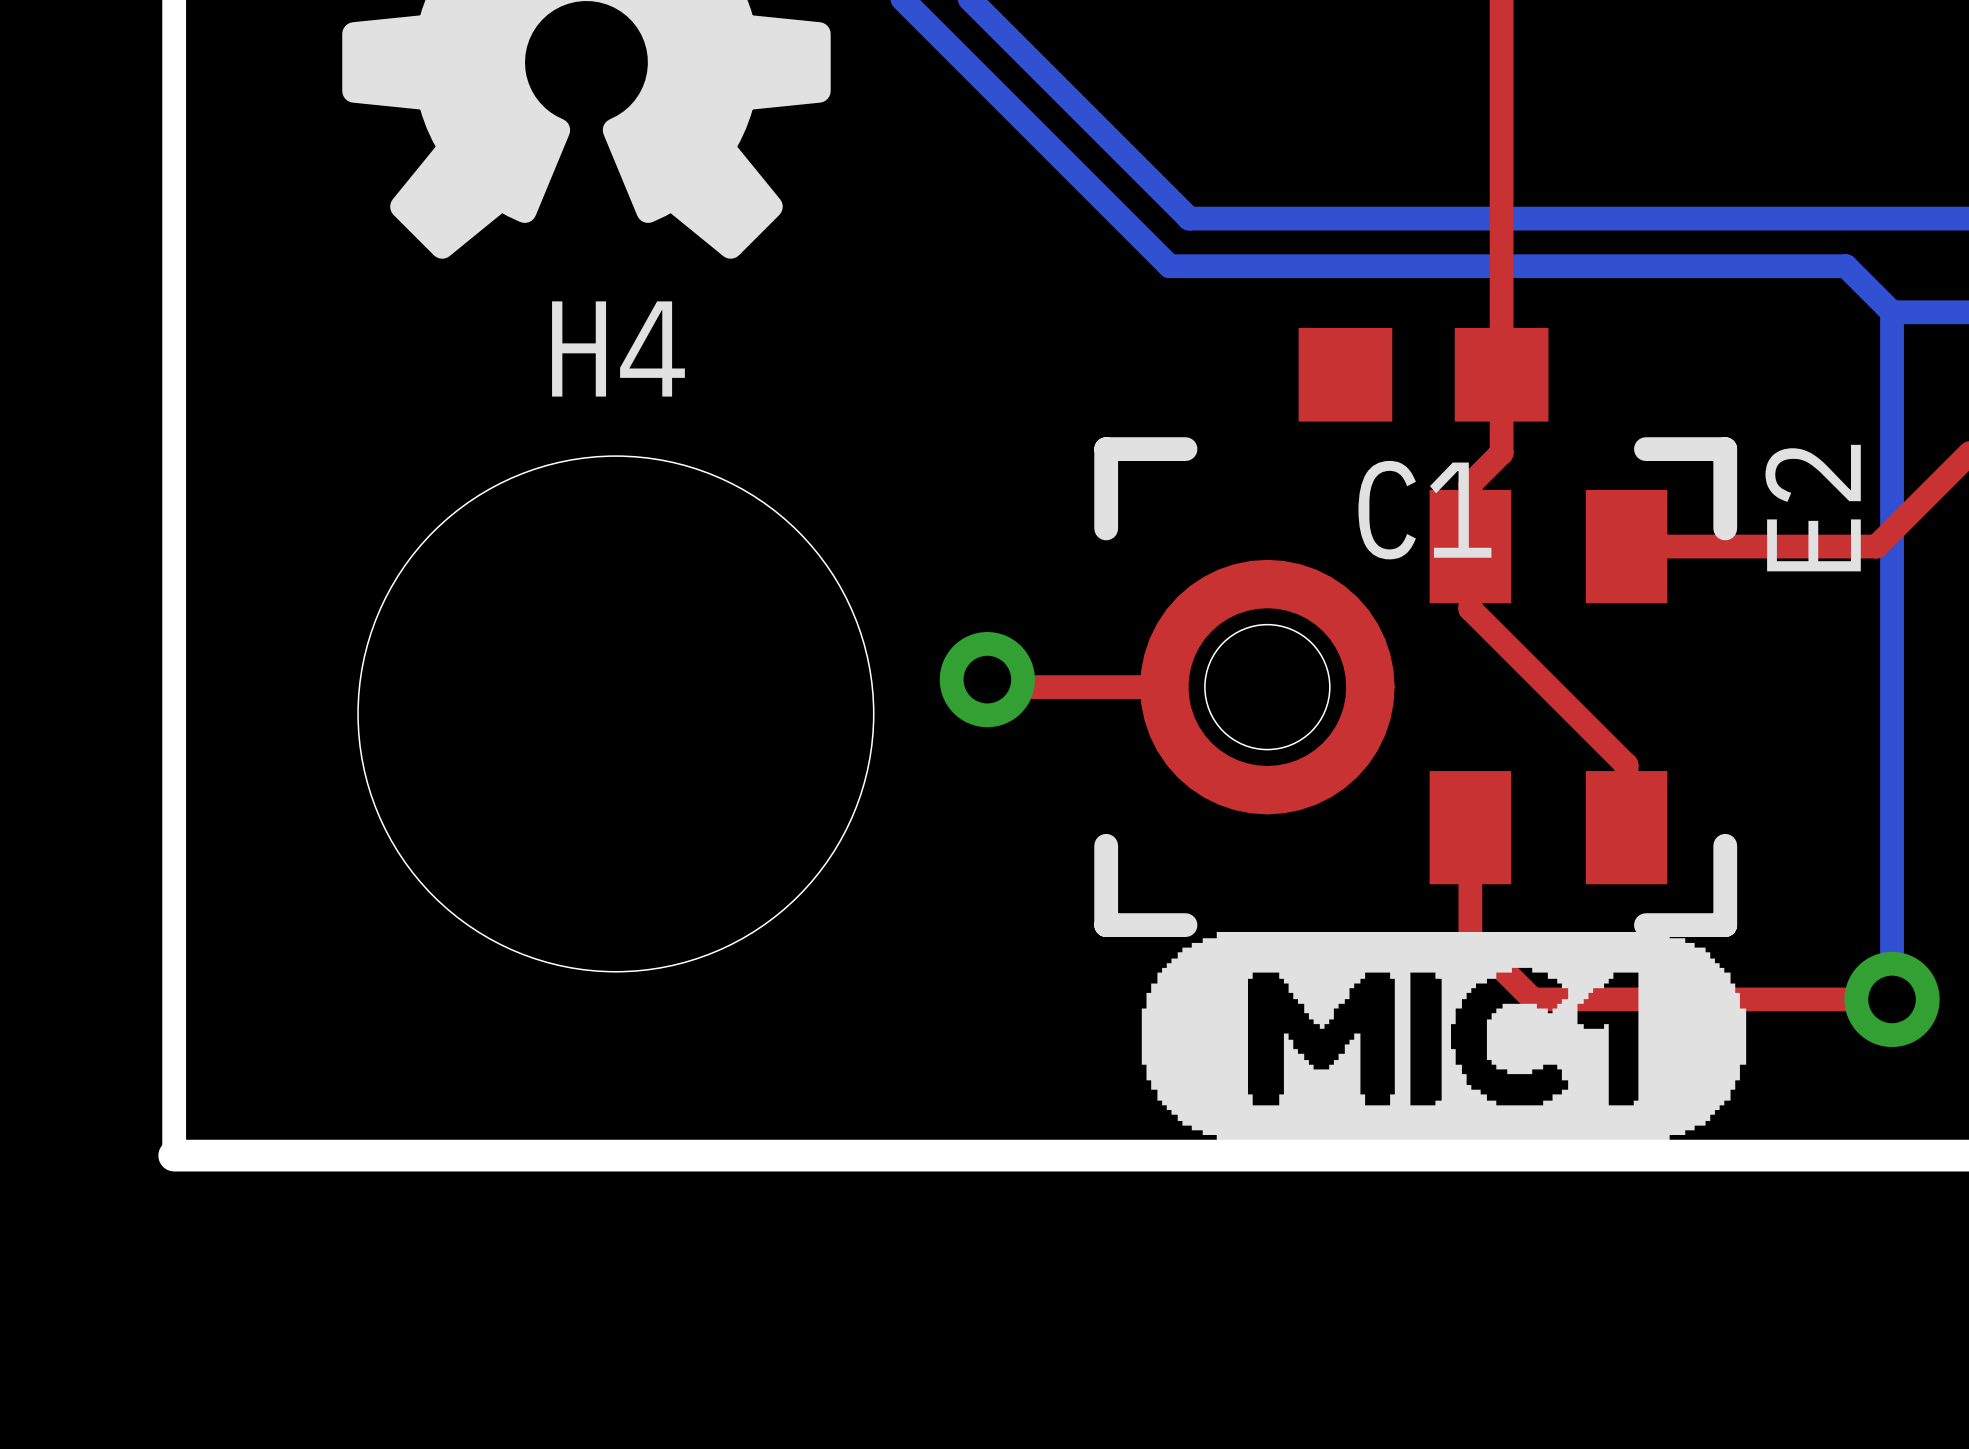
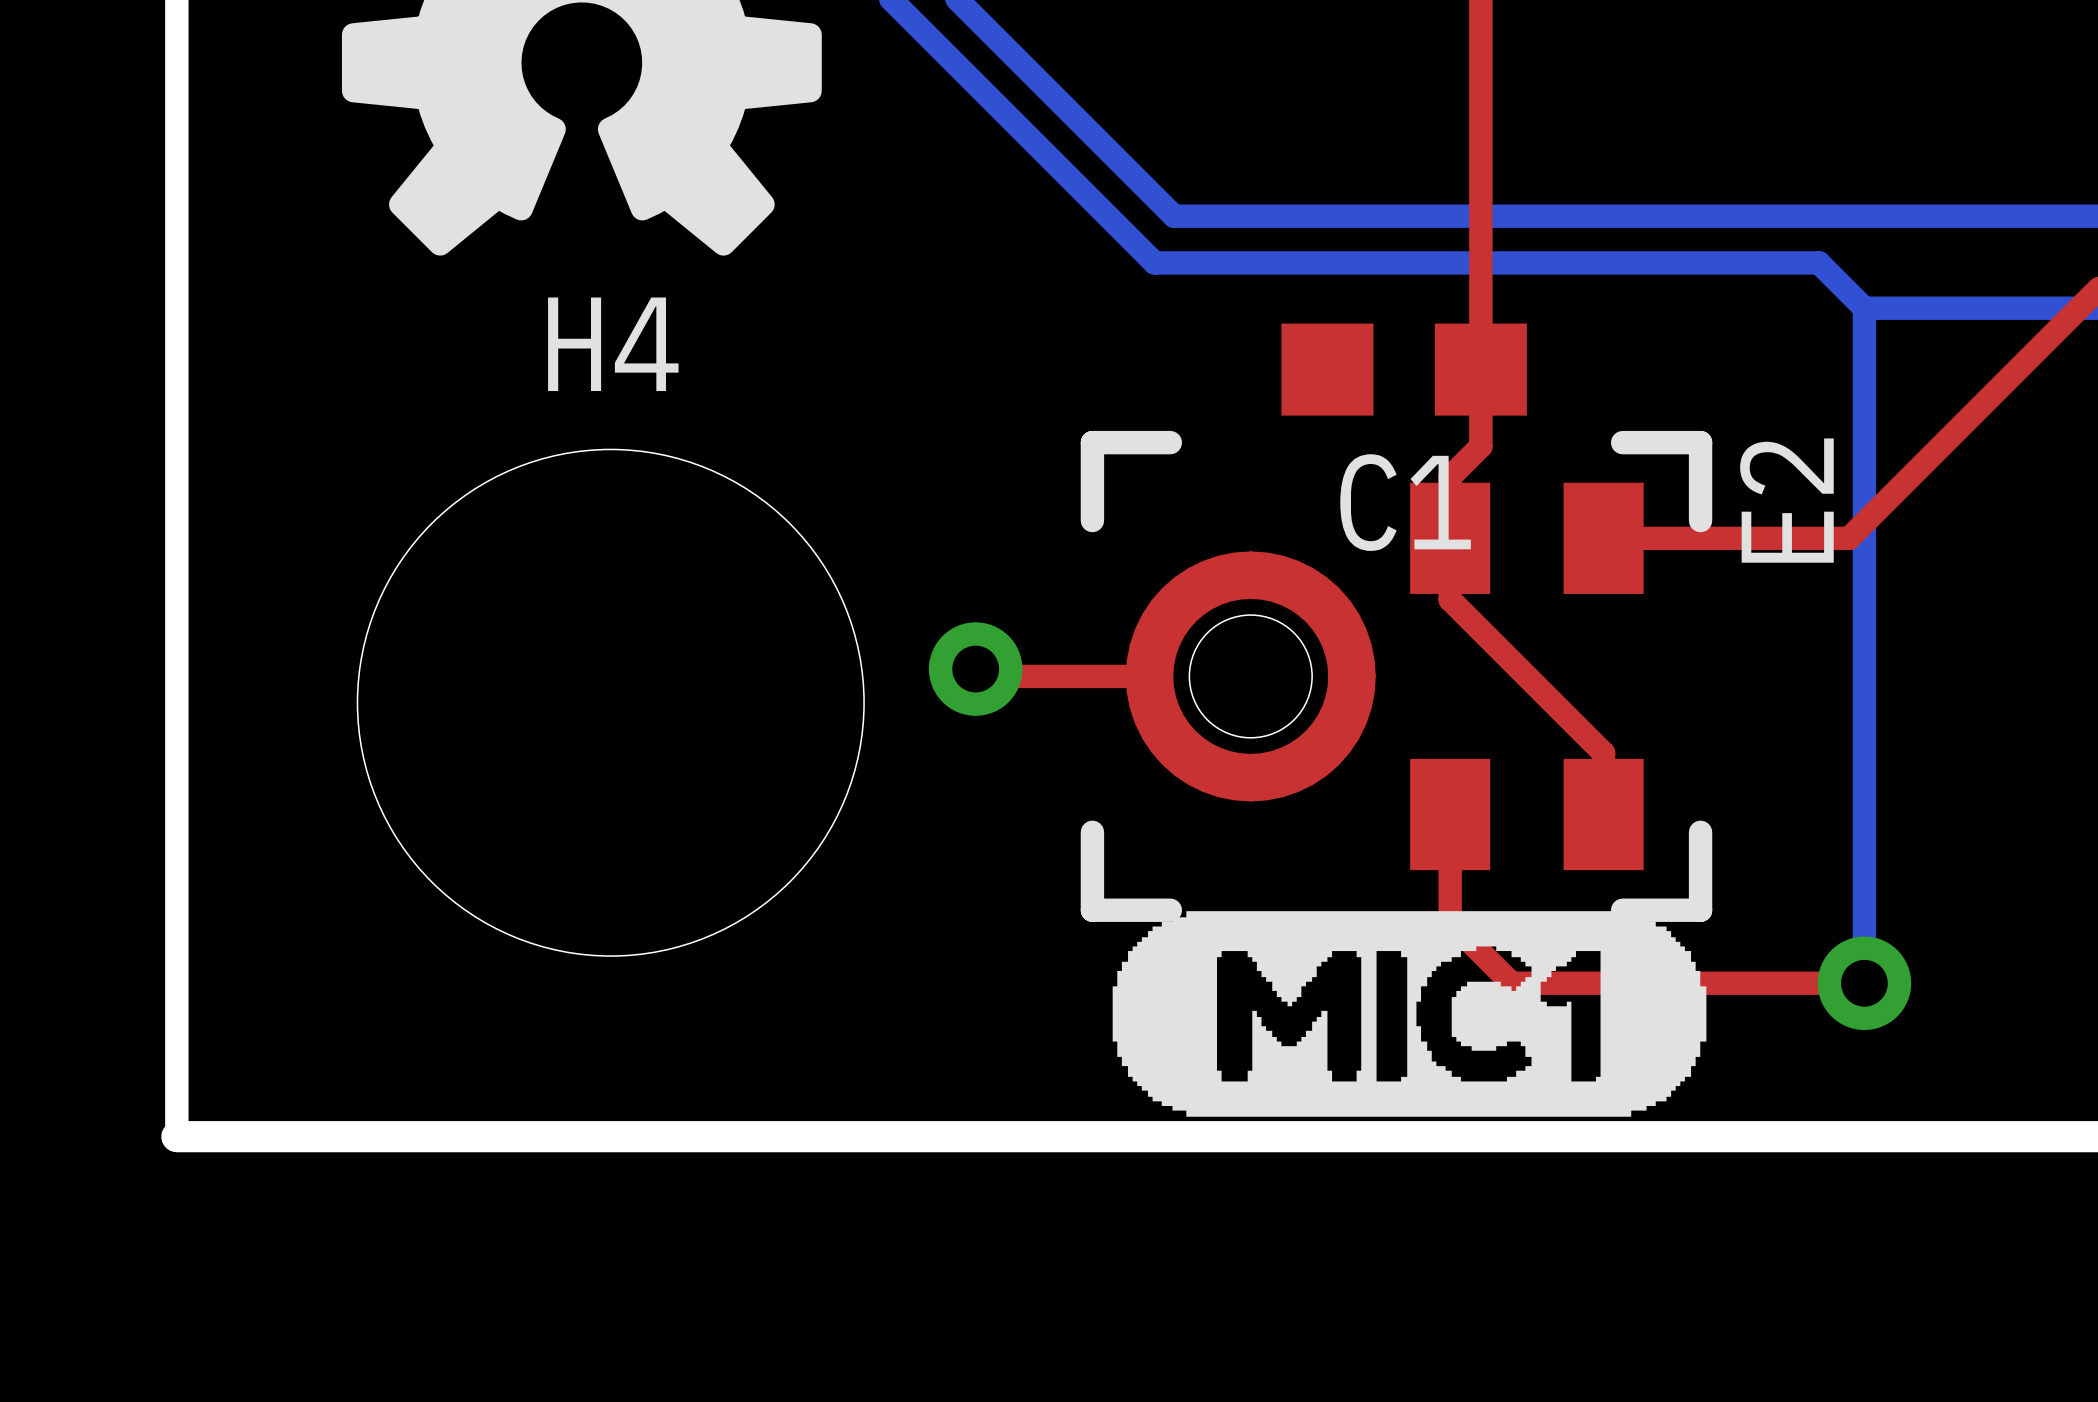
drawing position: (1443, 1036) -> (1409, 1013)

